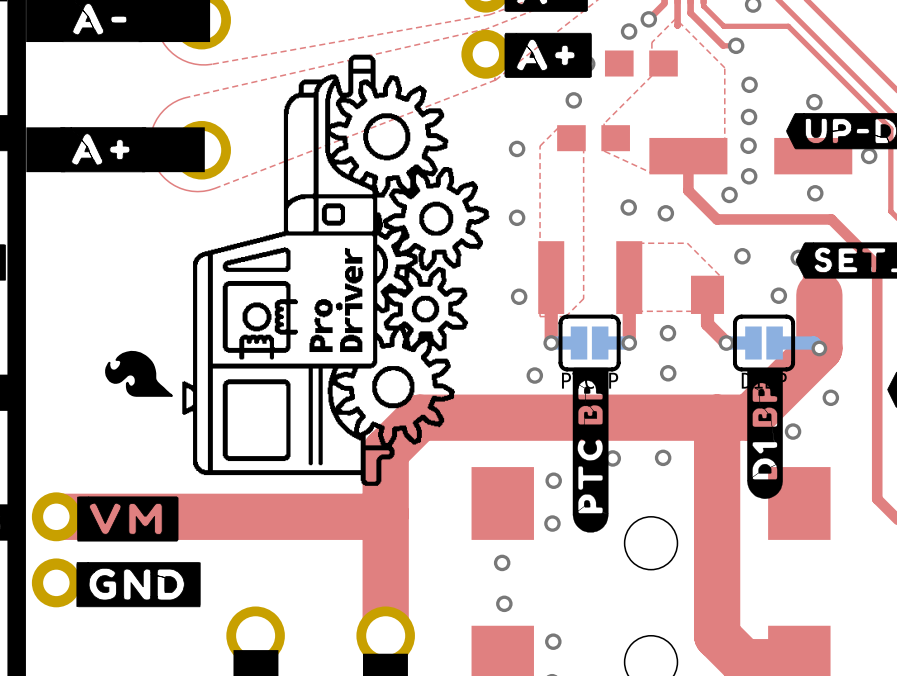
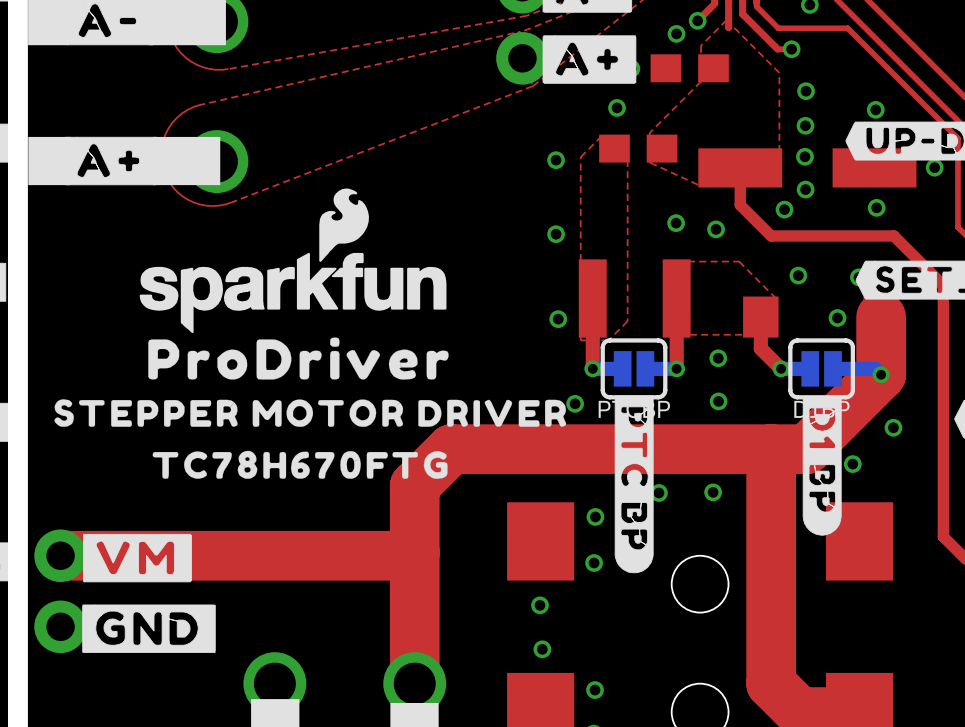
drawing: [105, 54, 490, 486] -> none
drawing: none -> [54, 188, 567, 479]
drawing shape: [572, 367, 609, 533] -> [614, 395, 654, 574]
drawing shape: [747, 370, 783, 499] -> [802, 396, 842, 536]

